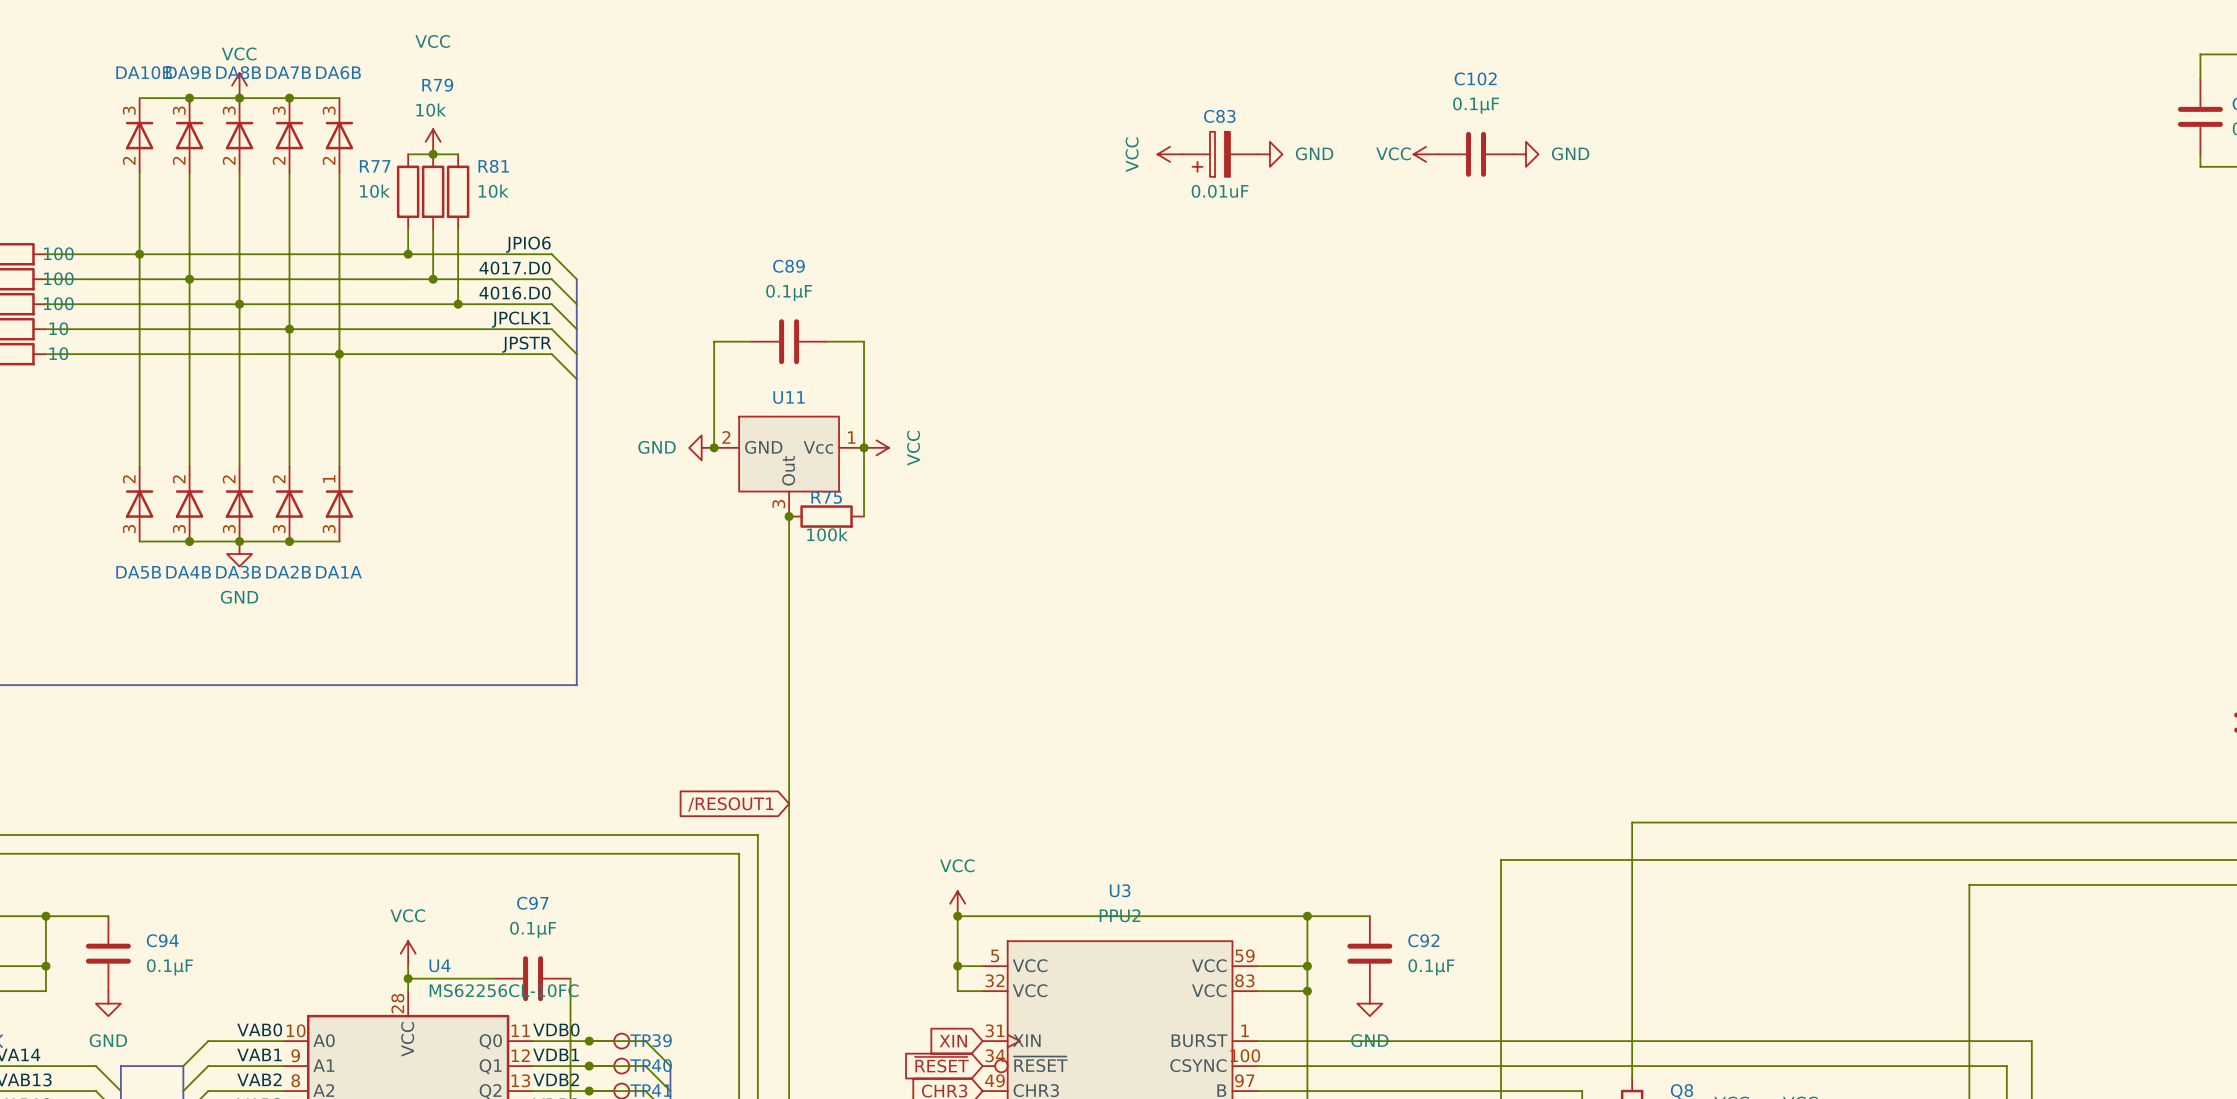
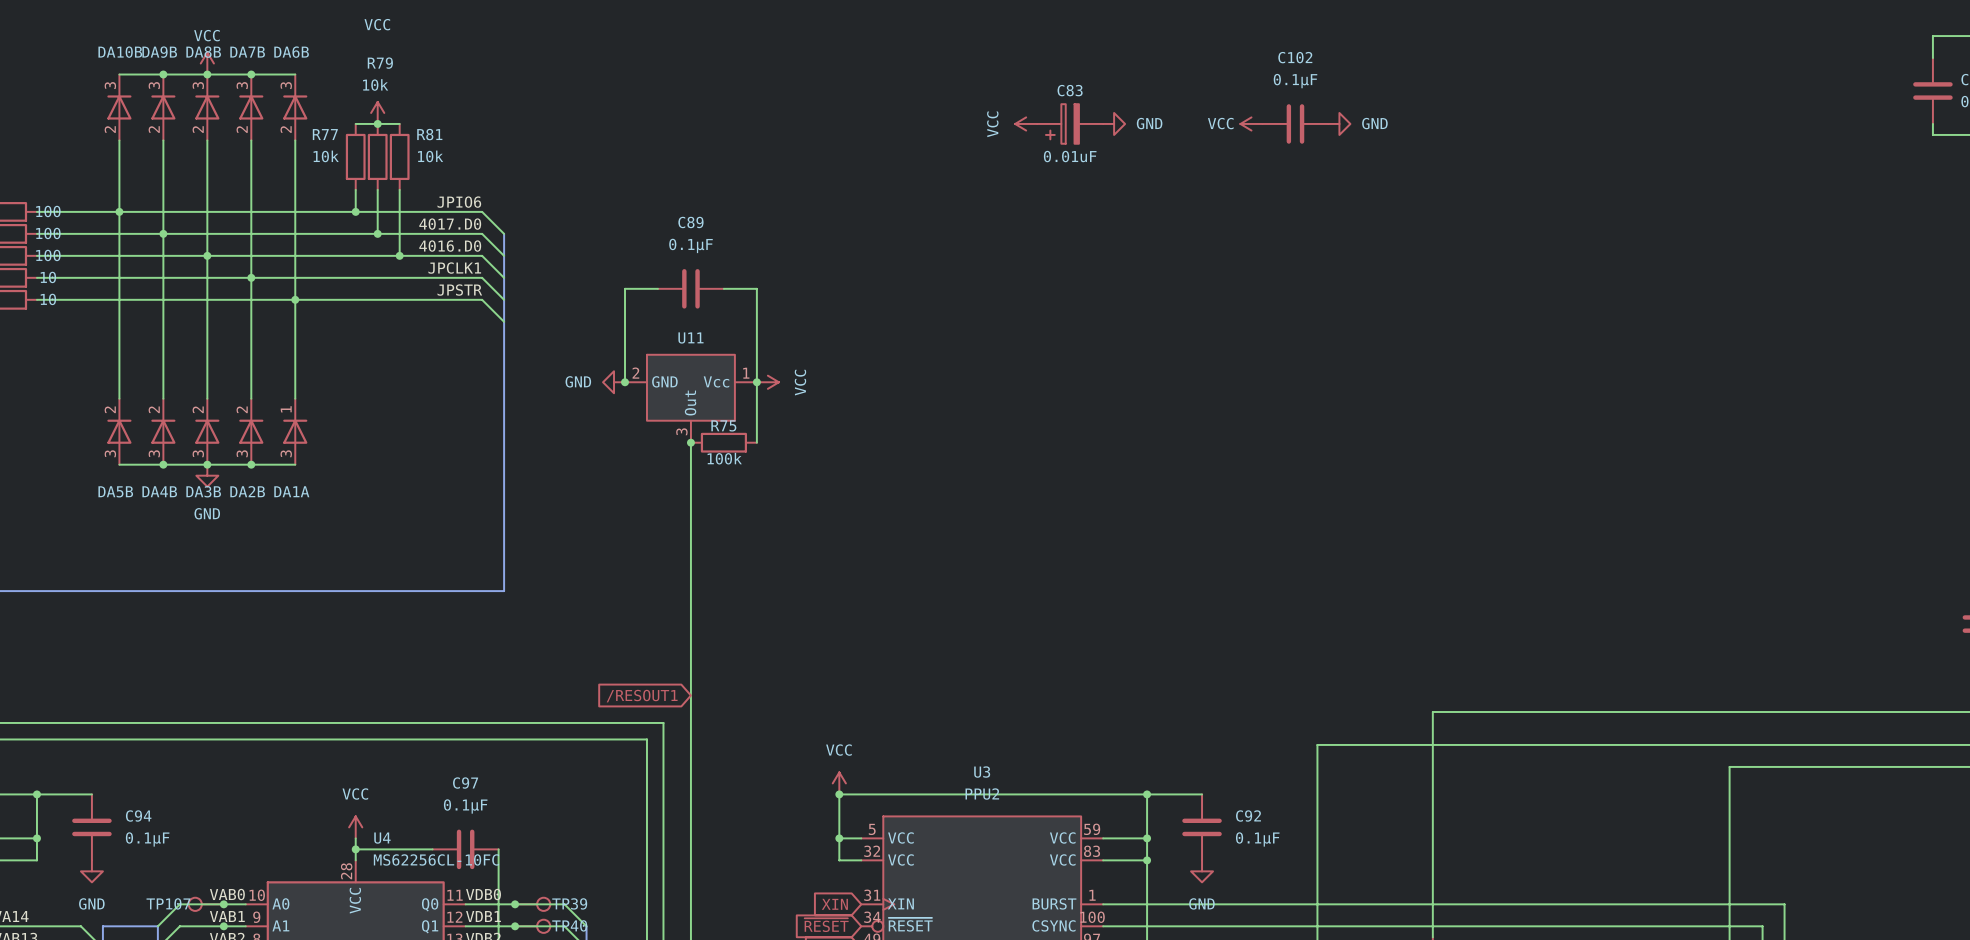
TP107: none -> (206, 904)
junction: none -> (223, 904)
junction: none -> (223, 926)

